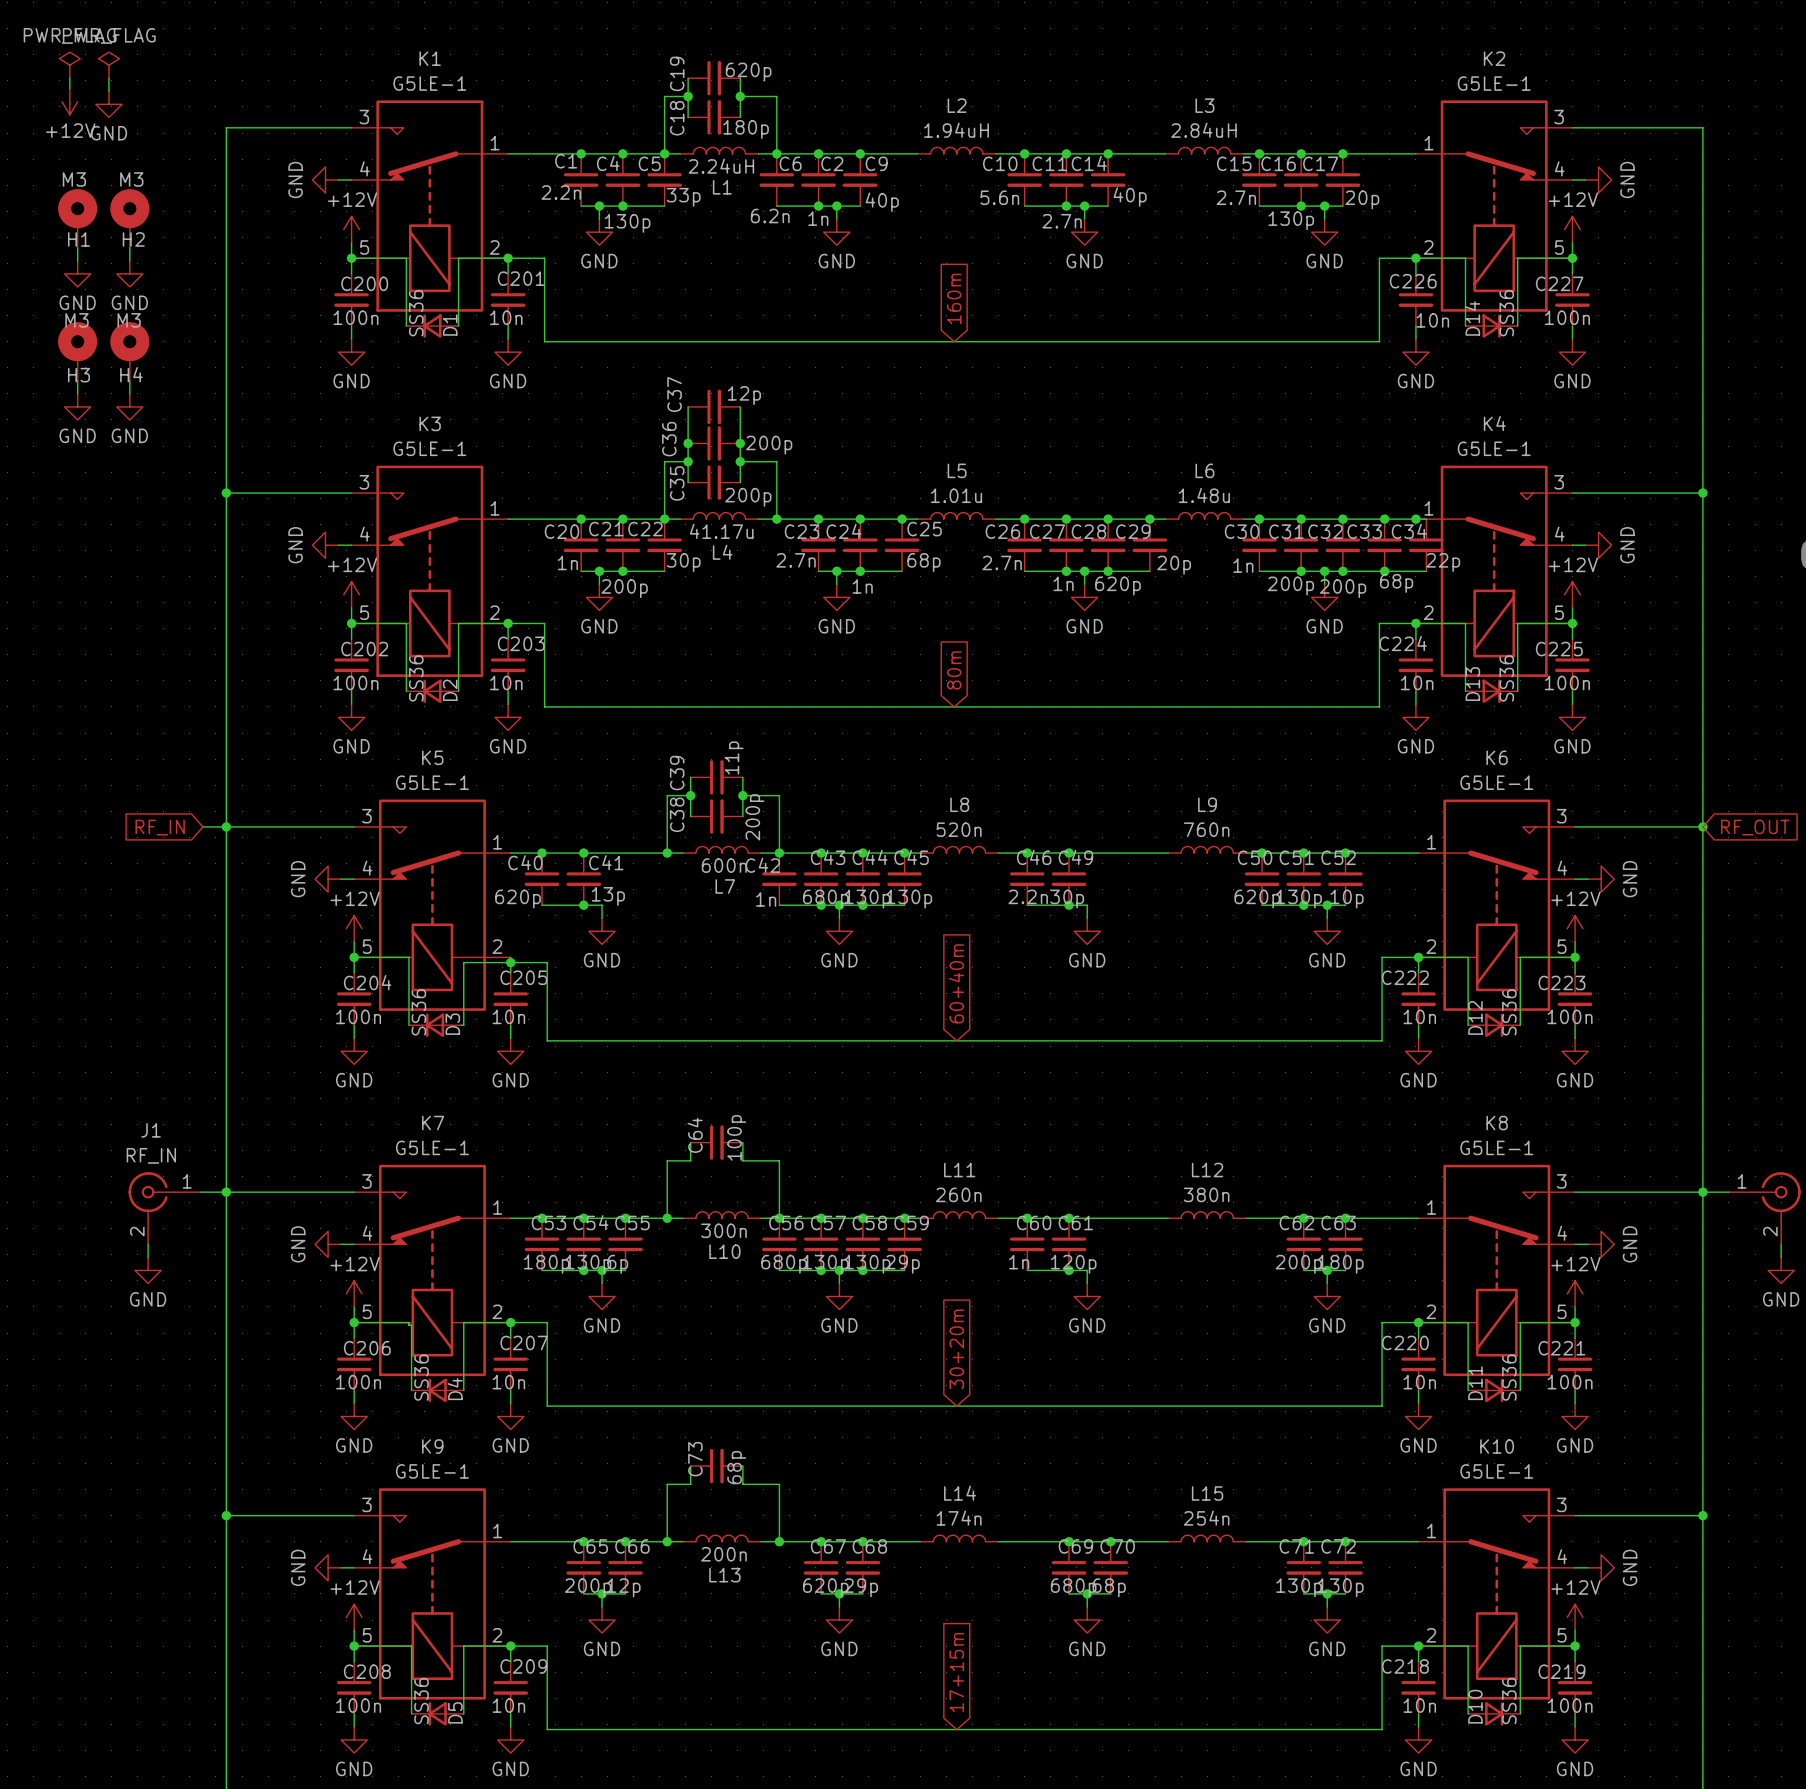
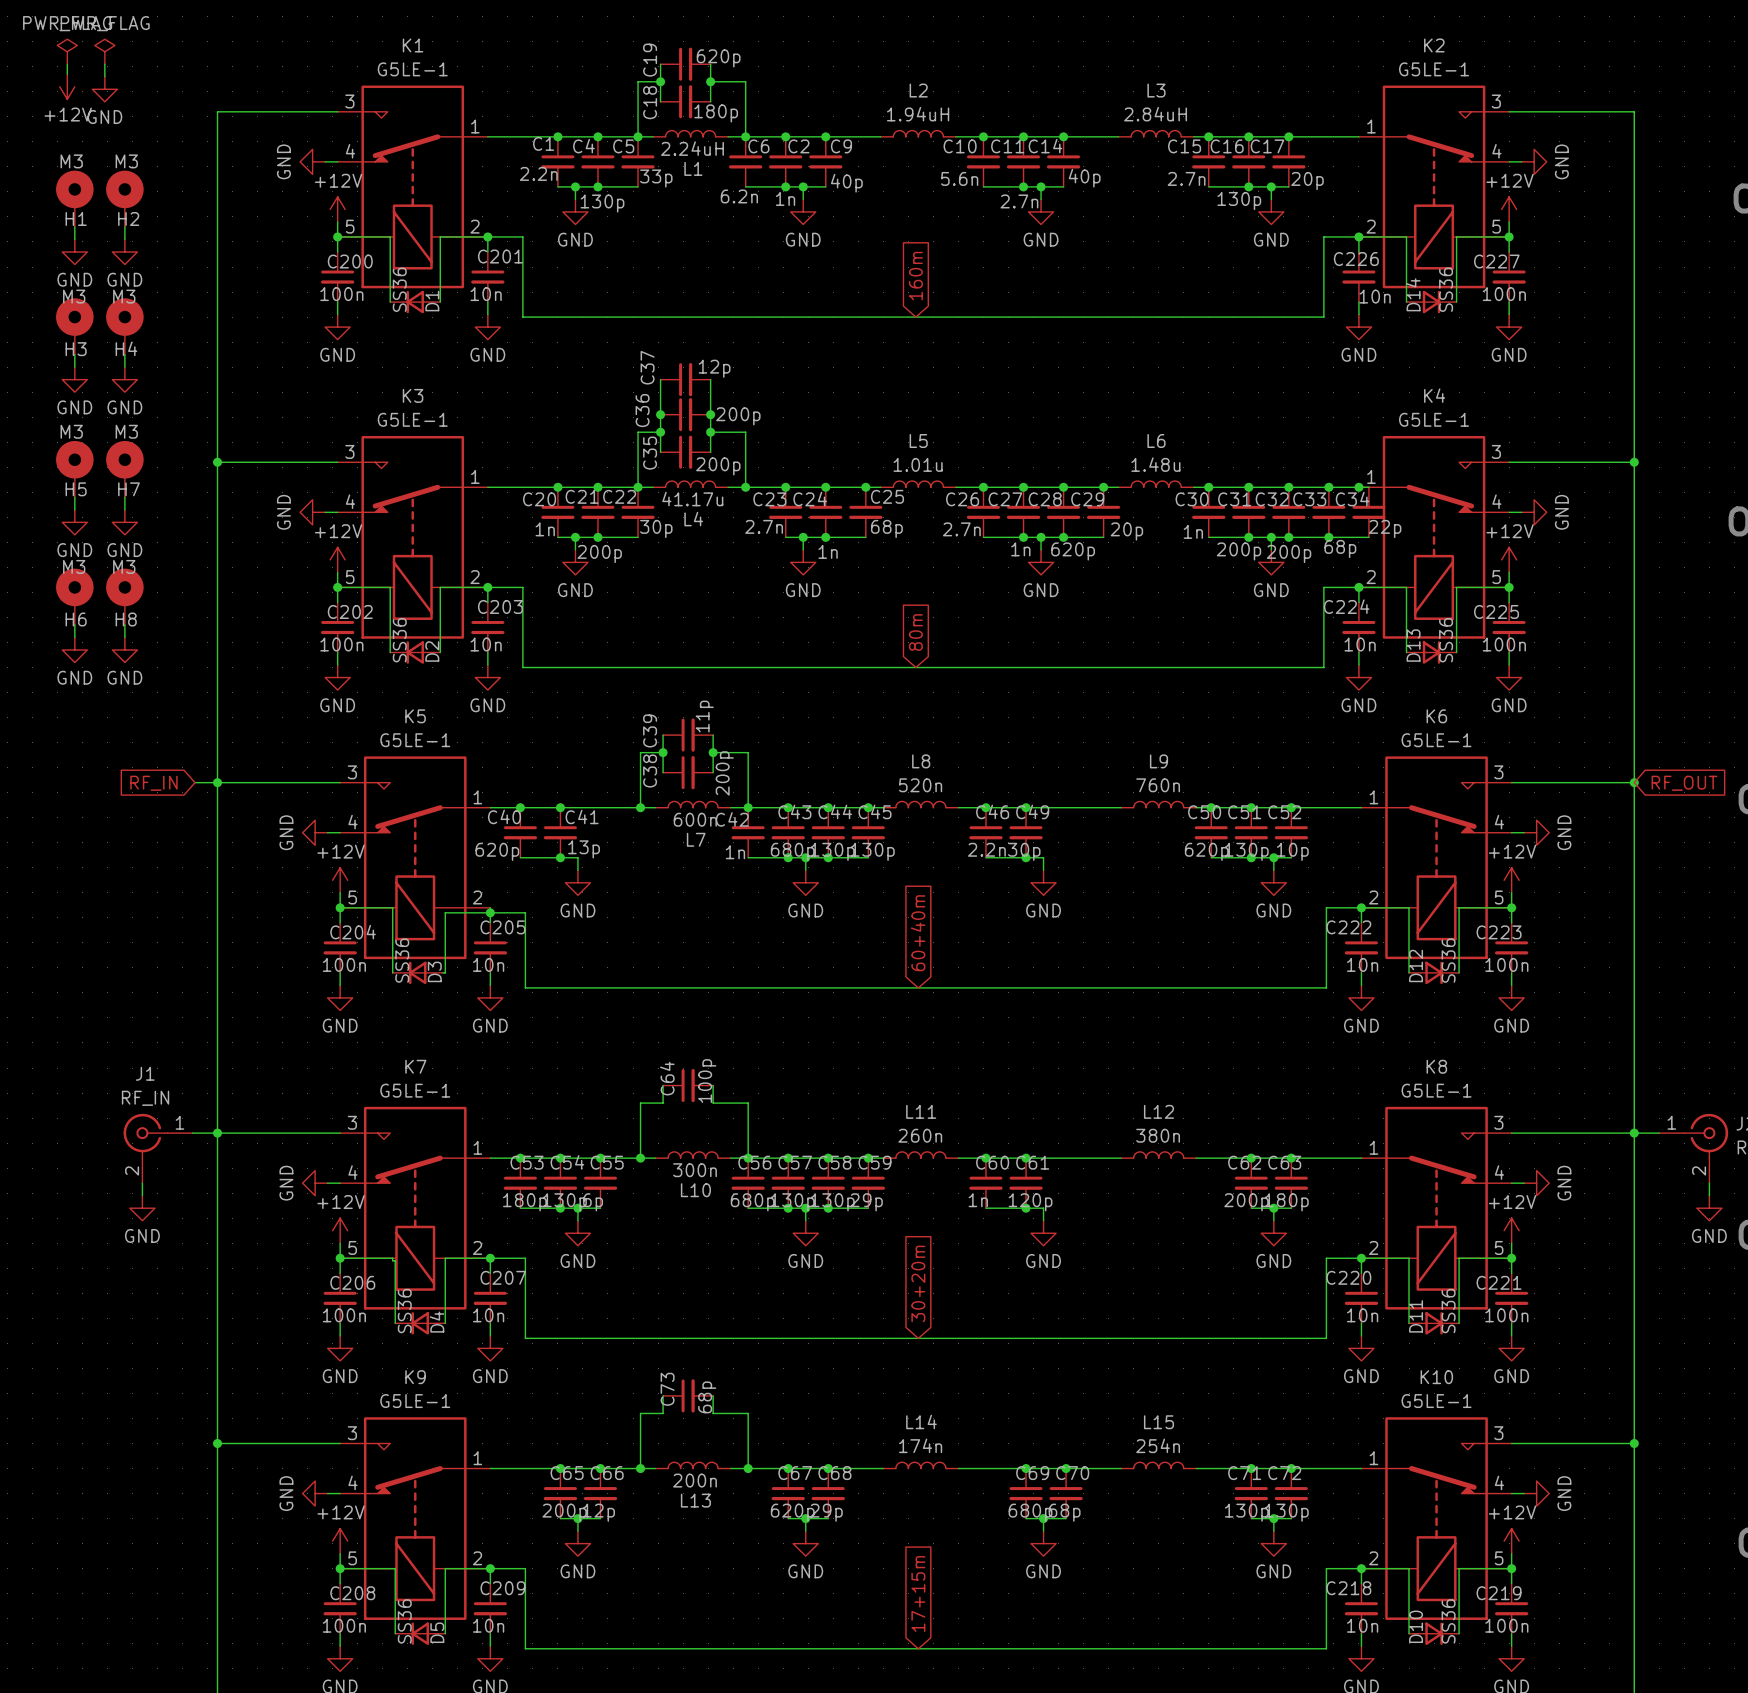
H5: none -> M3 (74, 469)
H7: none -> M3 (124, 469)
wire: none -> (74, 497) (74, 509)
wire: none -> (124, 497) (124, 509)
power symbol: none -> GND (74, 522)
power symbol: none -> GND (124, 522)
H6: none -> M3 (74, 596)
H8: none -> M3 (124, 596)
wire: none -> (74, 624) (74, 637)
wire: none -> (124, 624) (124, 637)
power symbol: none -> GND (74, 650)
power symbol: none -> GND (124, 650)

